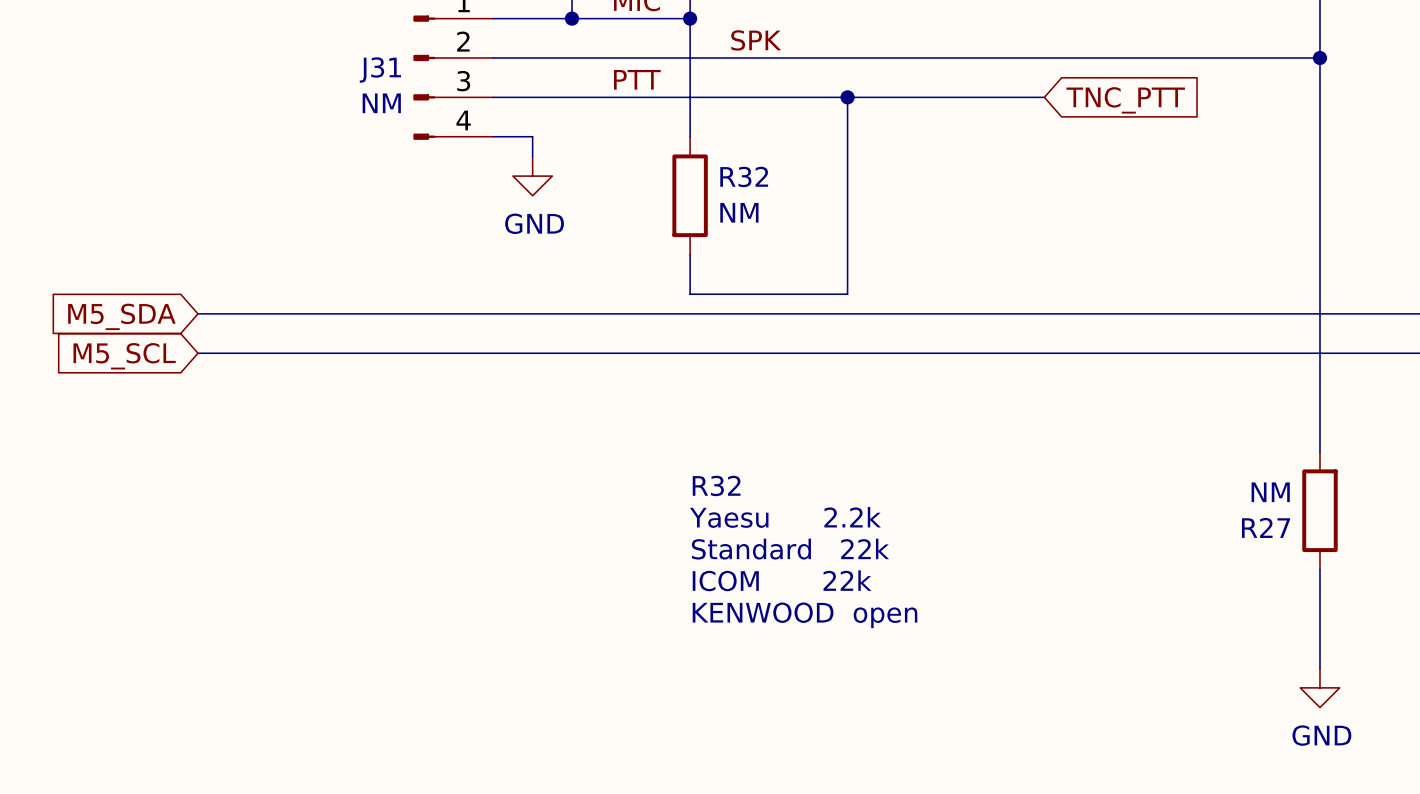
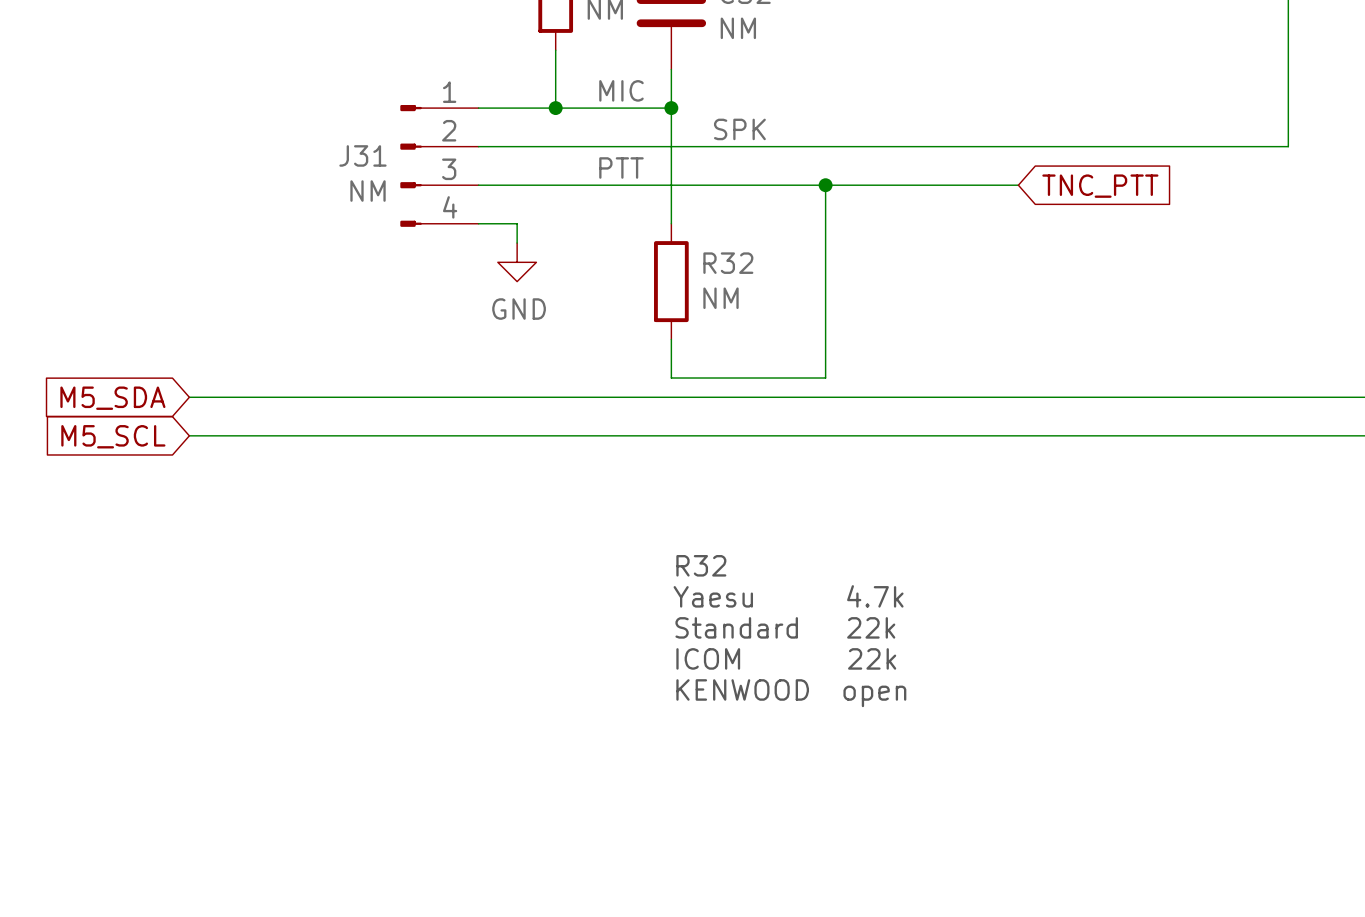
wire: (1319, 57) (1319, 451) -> none
junction: (1319, 57) -> none
R27: NM (1319, 510) -> none
text: Yaesu 2.2k (785, 517) -> Yaesu 4.7k (788, 596)
wire: (1319, 569) (1319, 668) -> none
power symbol: GND (1319, 687) -> none

